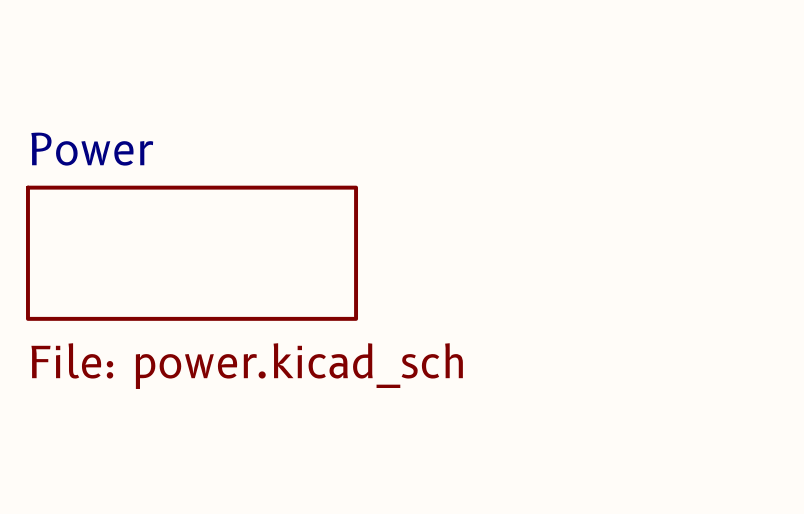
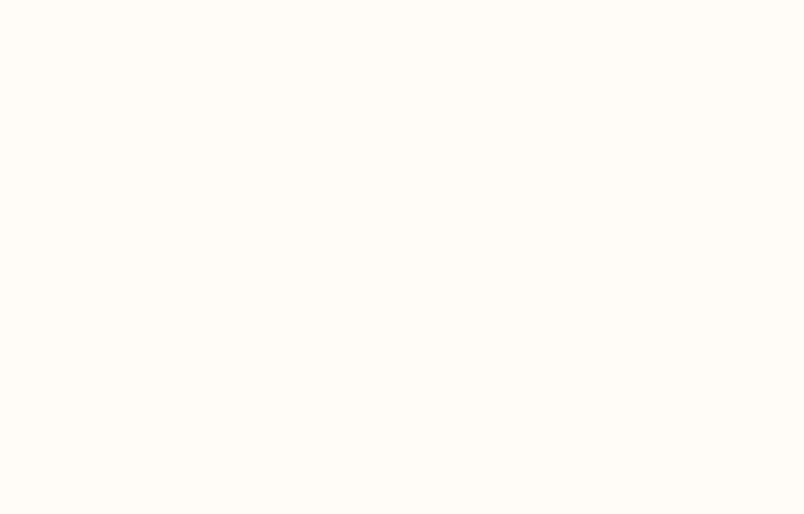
sheet Power: File: power.kicad_sch (192, 253) -> none

